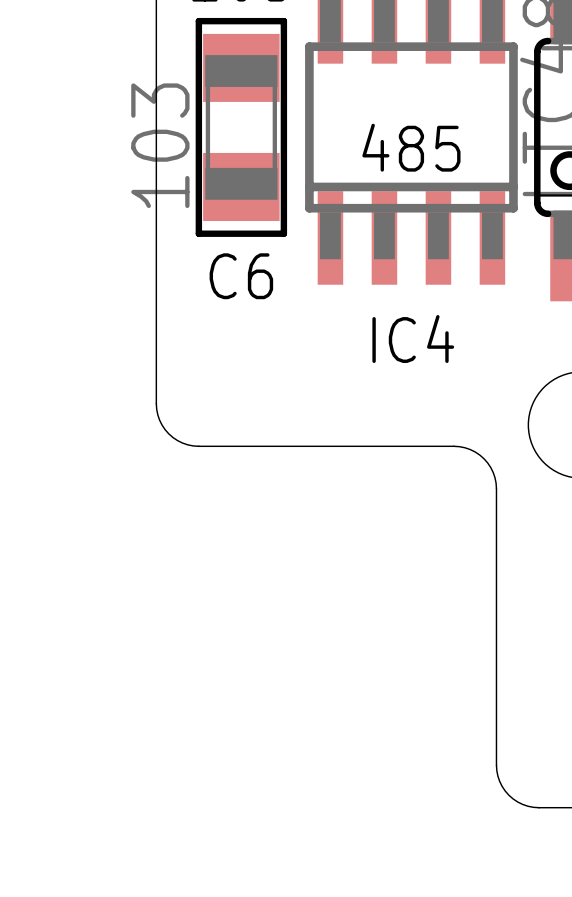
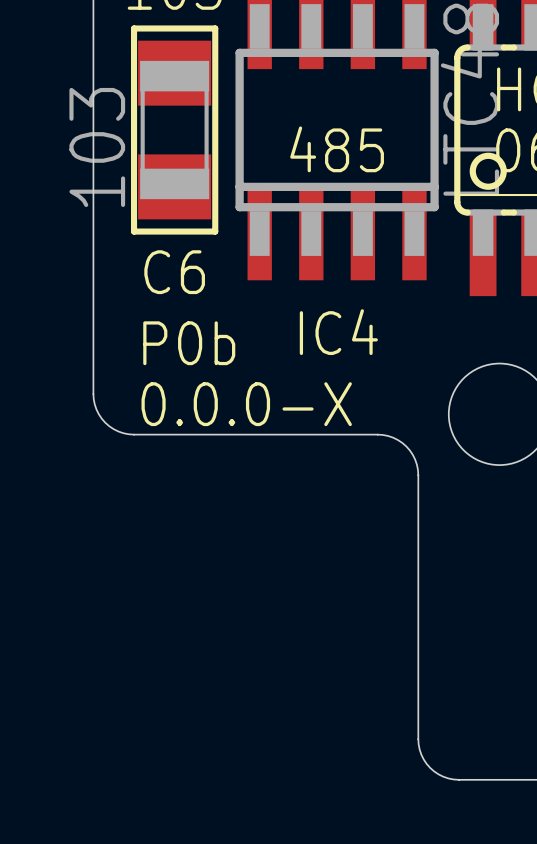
text: none -> P0b (189, 343)
text: none -> 0.0.0-X (246, 404)

